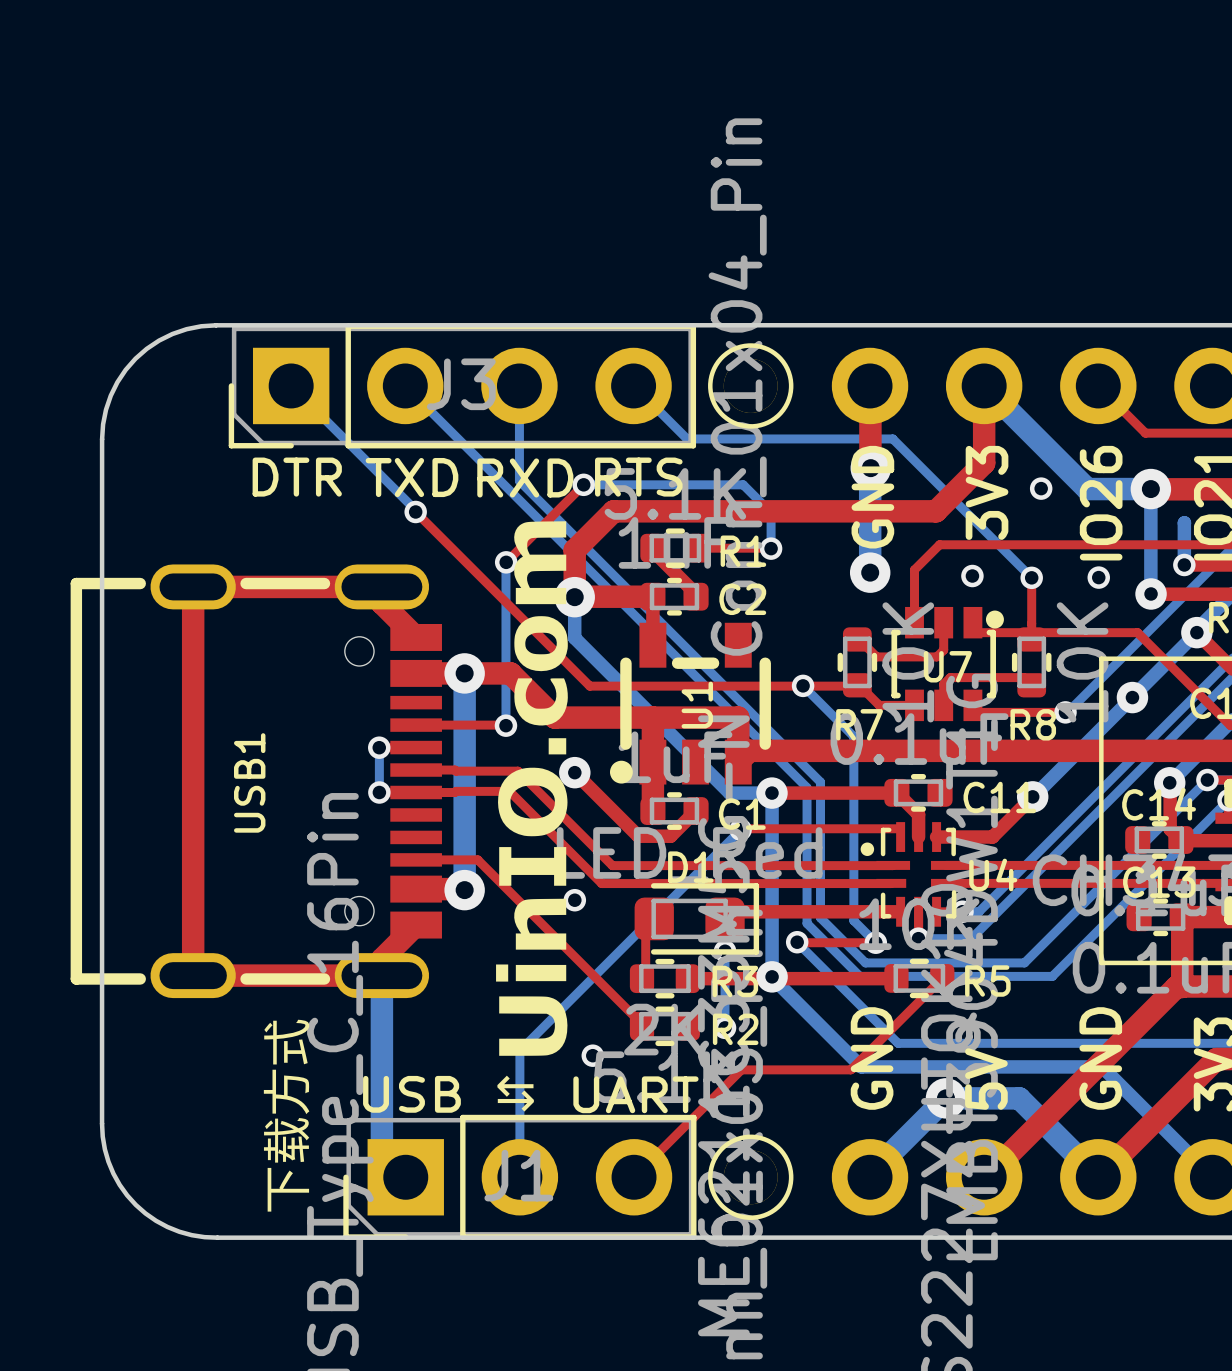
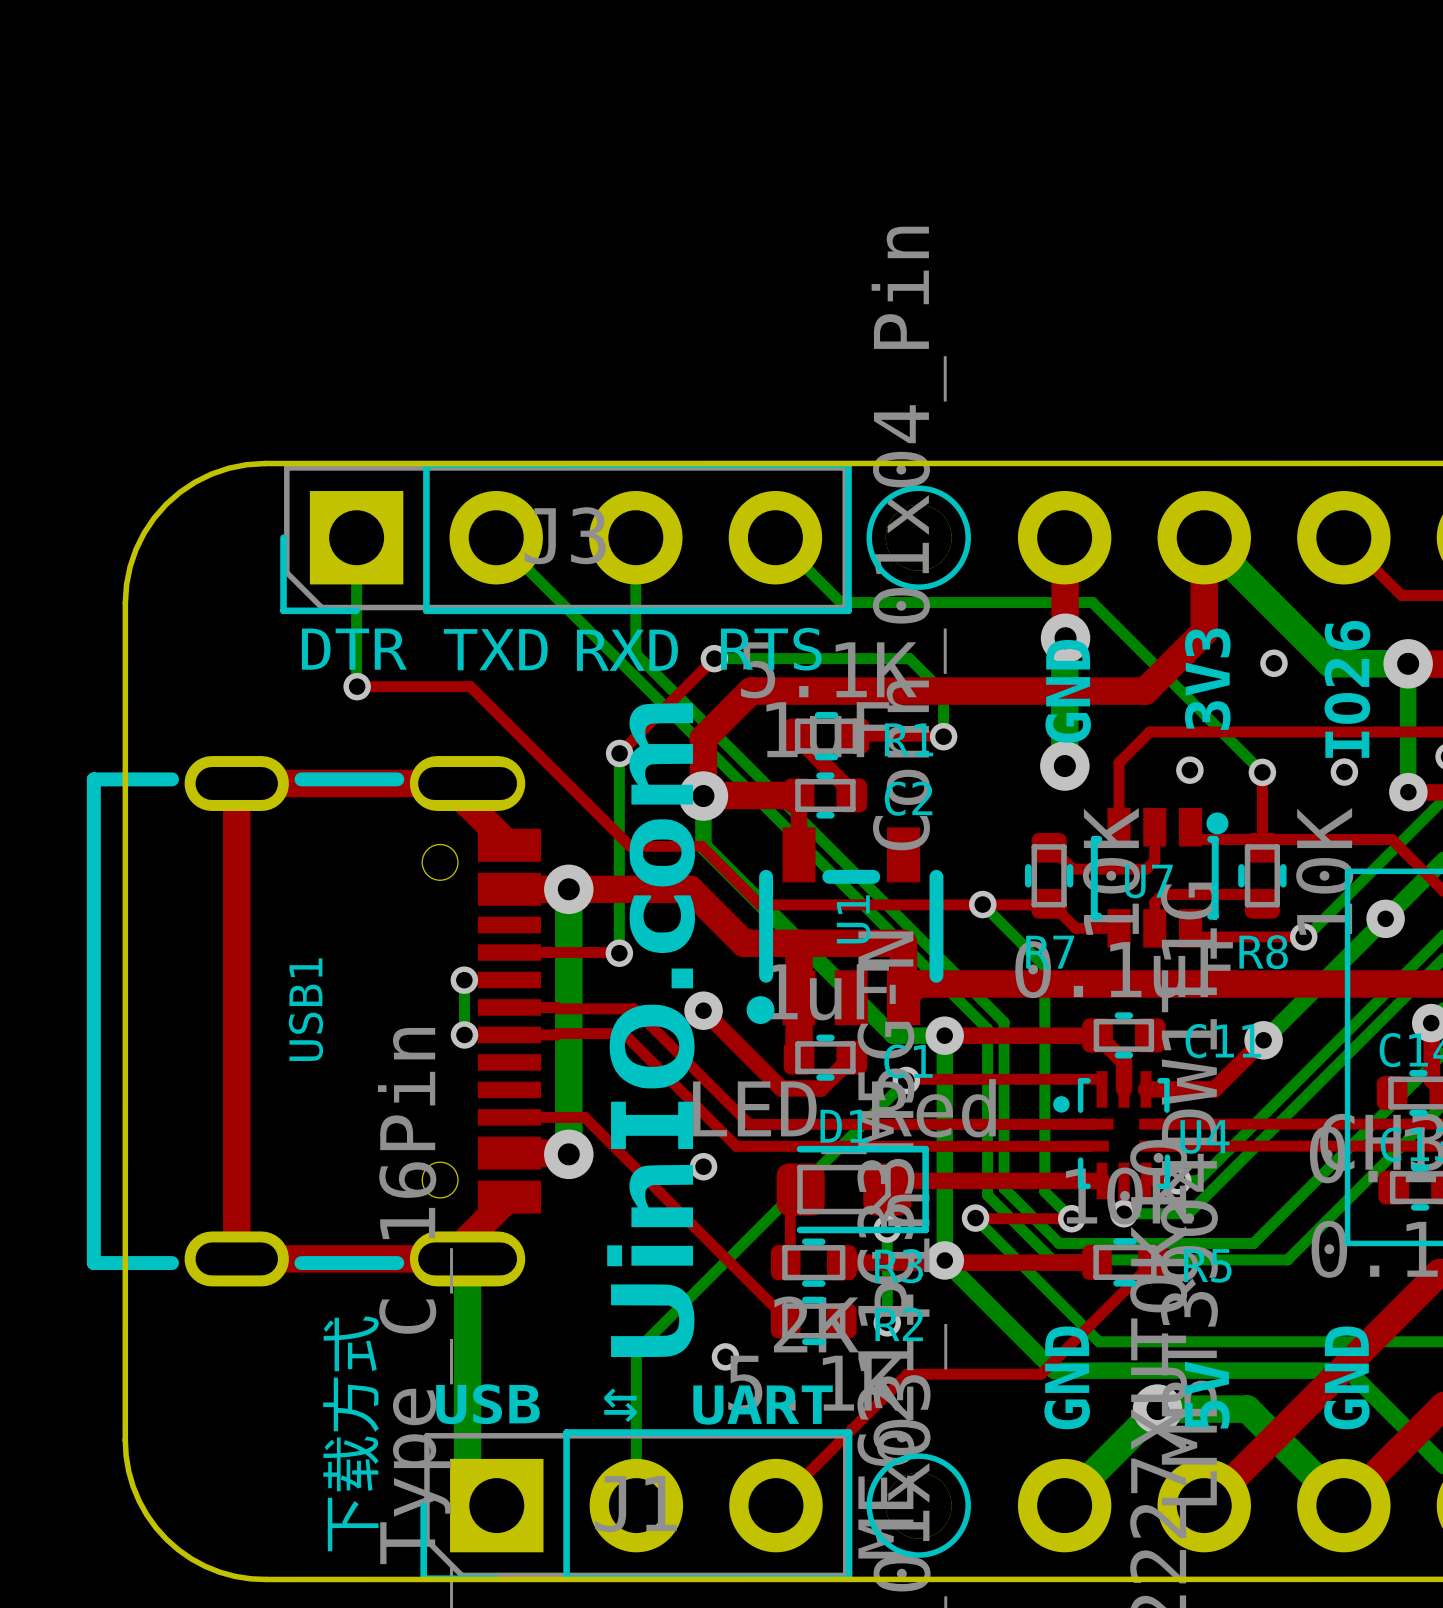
bottom track: (291, 385) (415, 511) -> (356, 537) (356, 686)
top track: (415, 511) (589, 686) (621, 686) -> (357, 686) (470, 686) (630, 846) (701, 846) (760, 904)
via position: (415, 511) -> (357, 686)
top track: (510, 673) (554, 717) (607, 717) -> (625, 889) (690, 889) (744, 943)

